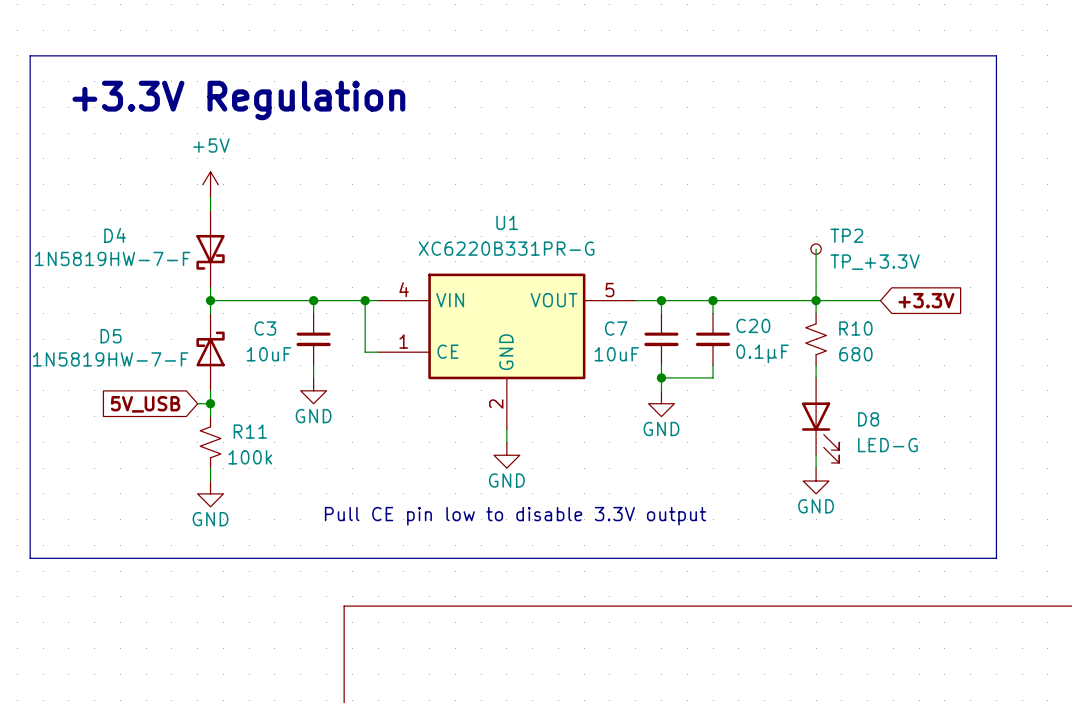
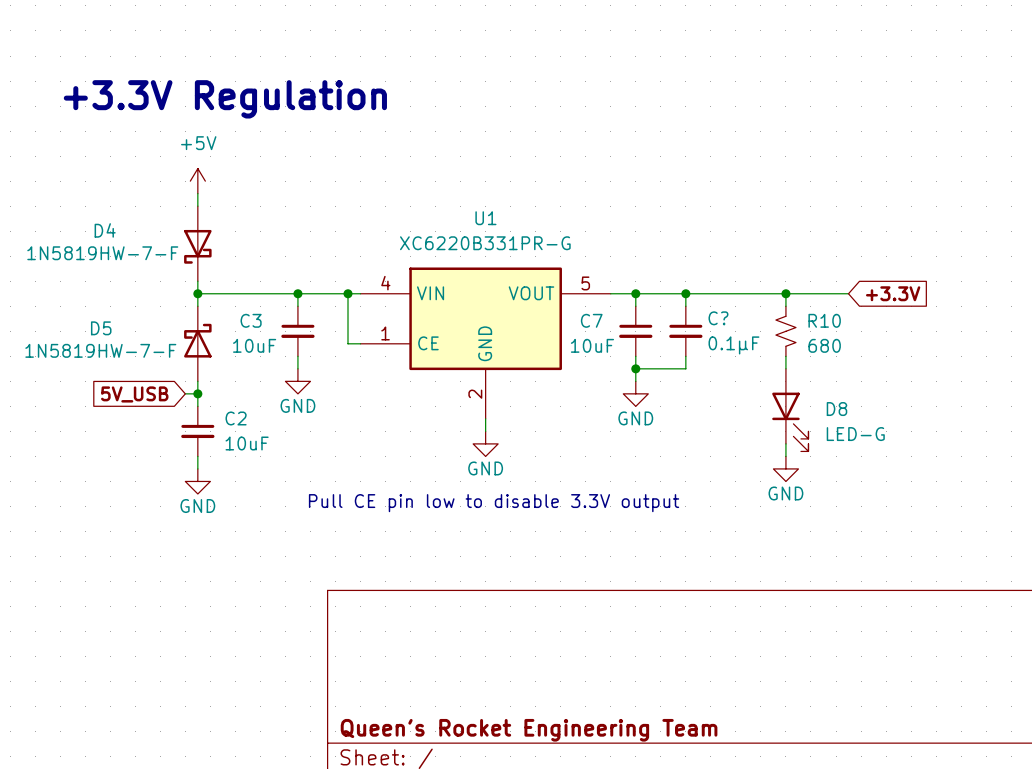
line: (30, 55) (996, 55) (996, 558) (30, 558) (30, 55) -> none
wire: (816, 249) (816, 300) -> none
TP2: TP_+3.3V (816, 249) -> none
C20 name: C20 (753, 325) -> C? (718, 318)
R11: 100k (210, 442) -> none
C2: none -> 10uF (197, 431)

